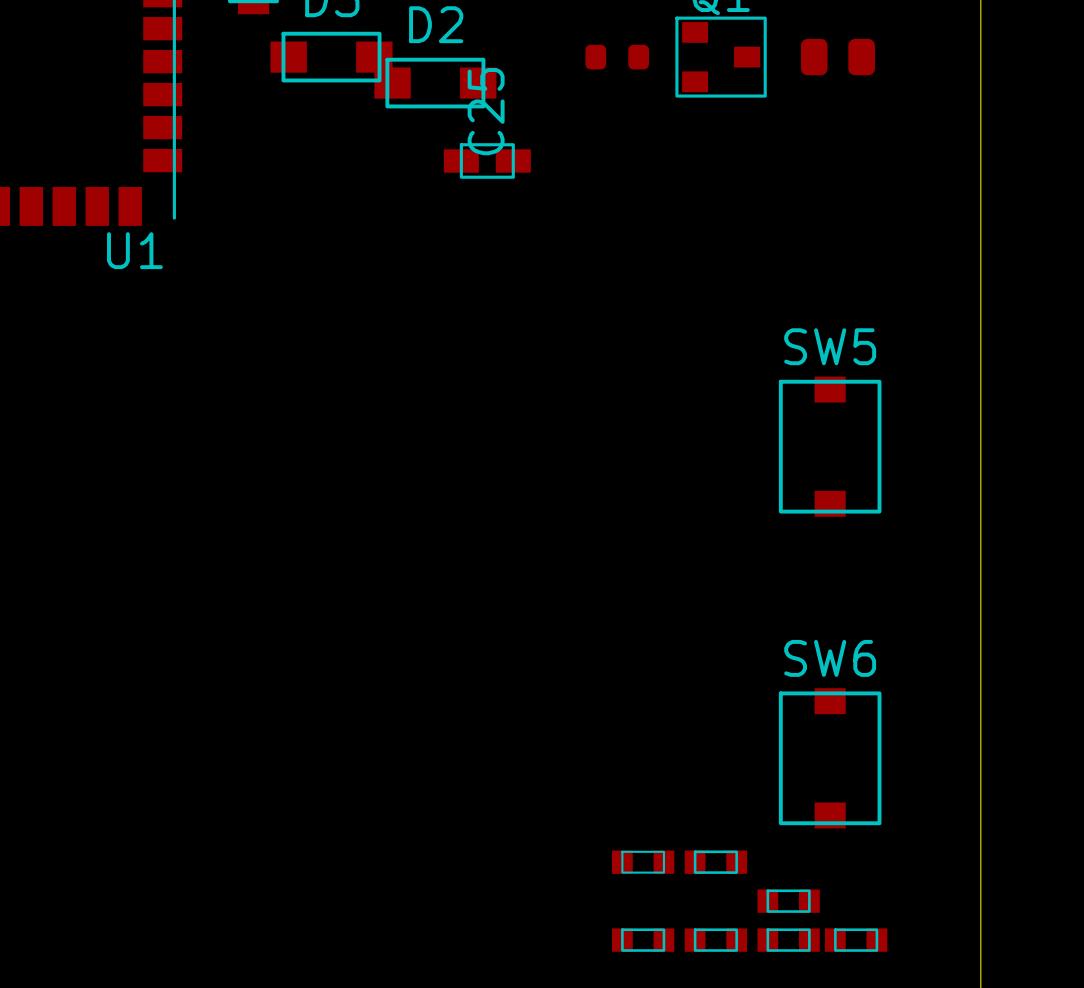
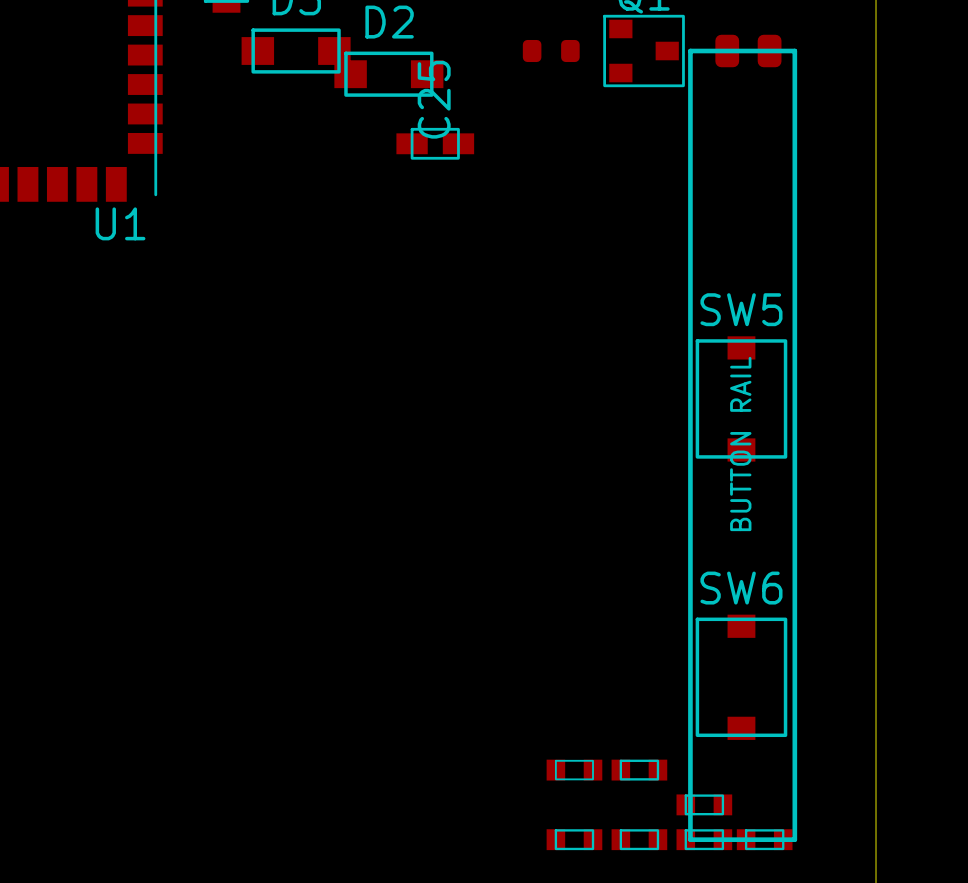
line: none -> (690, 51) (794, 51) (794, 839) (690, 839) (690, 51)
text: none -> BUTTON RAIL (740, 444)

